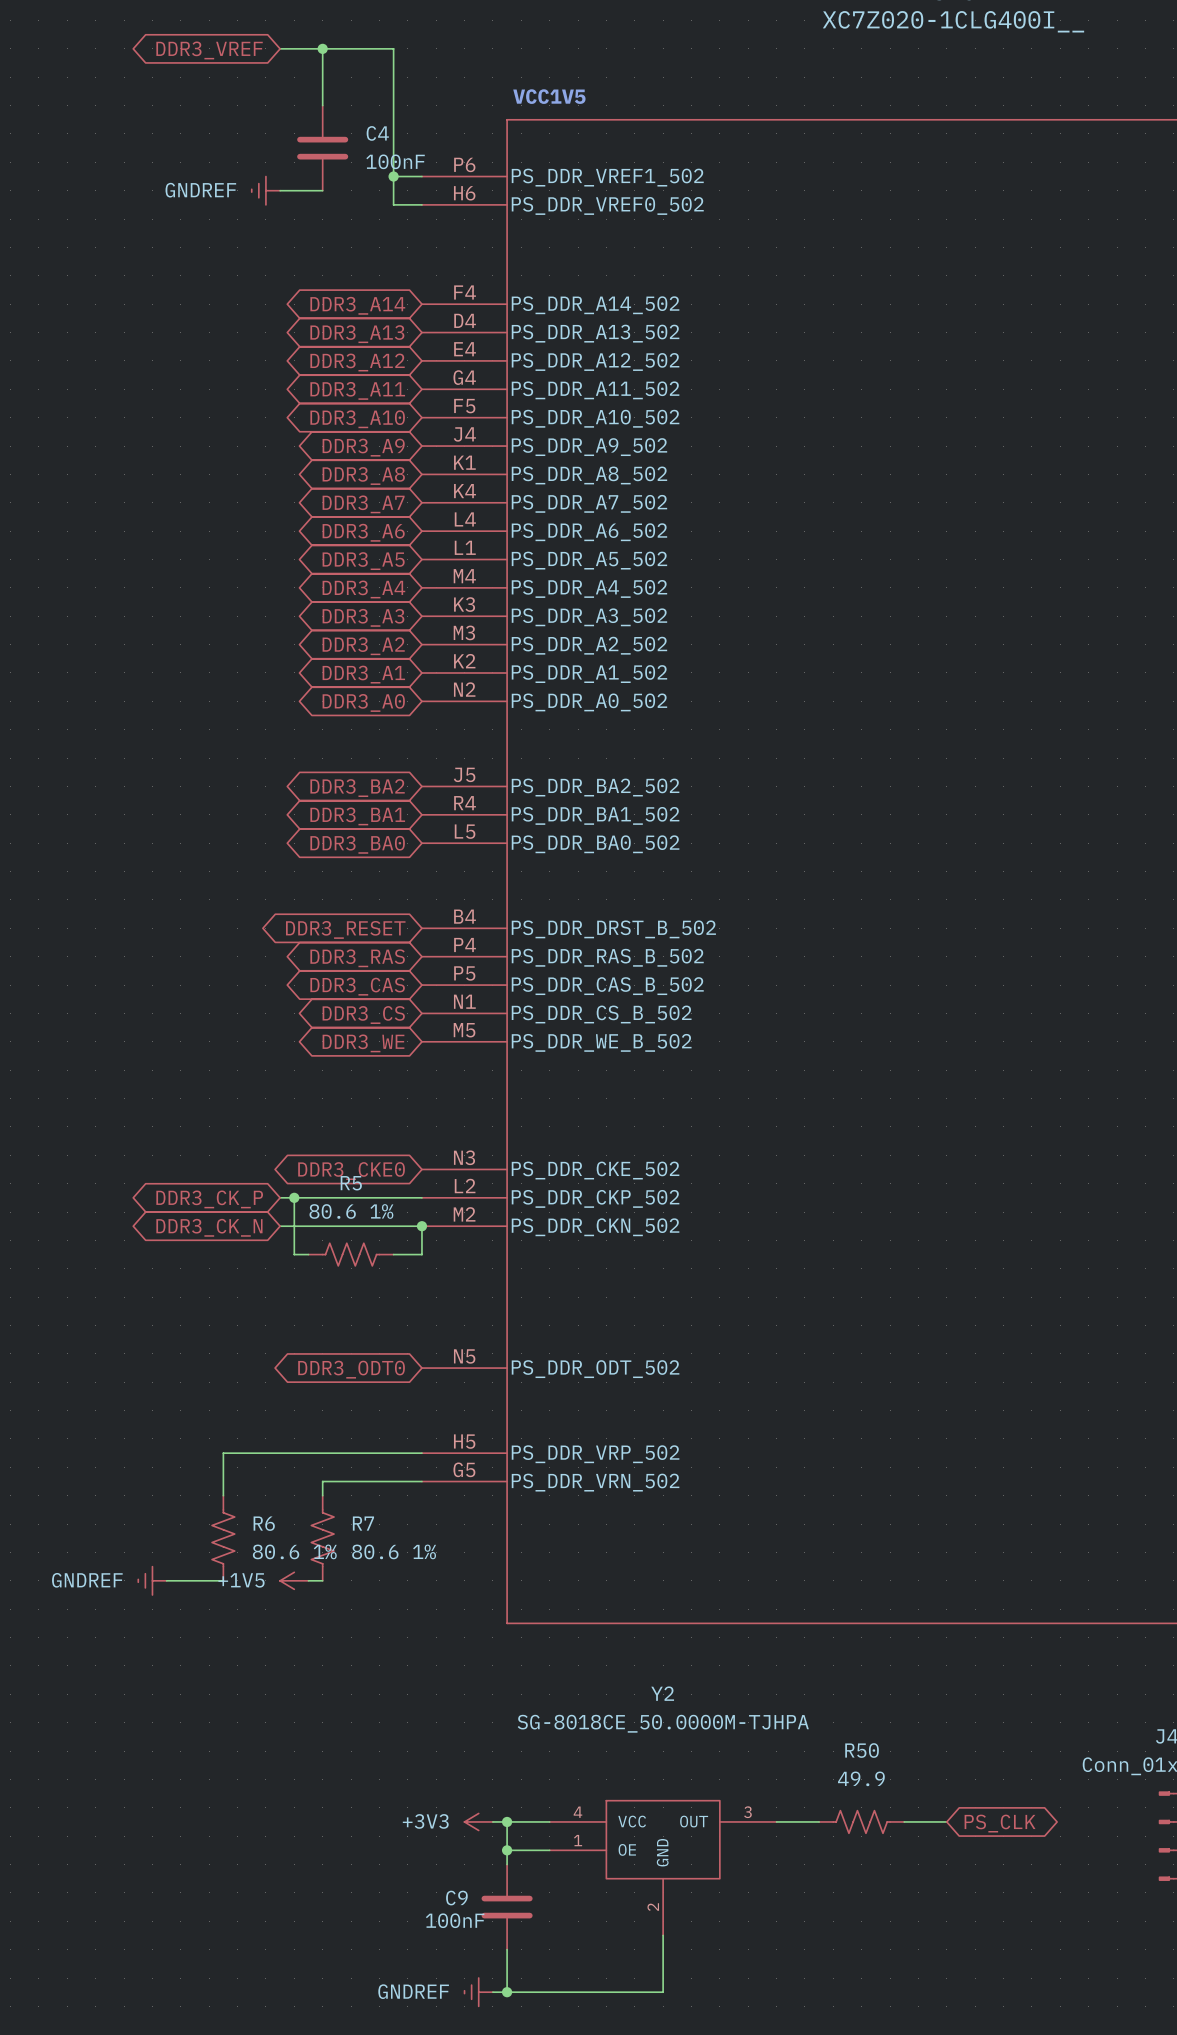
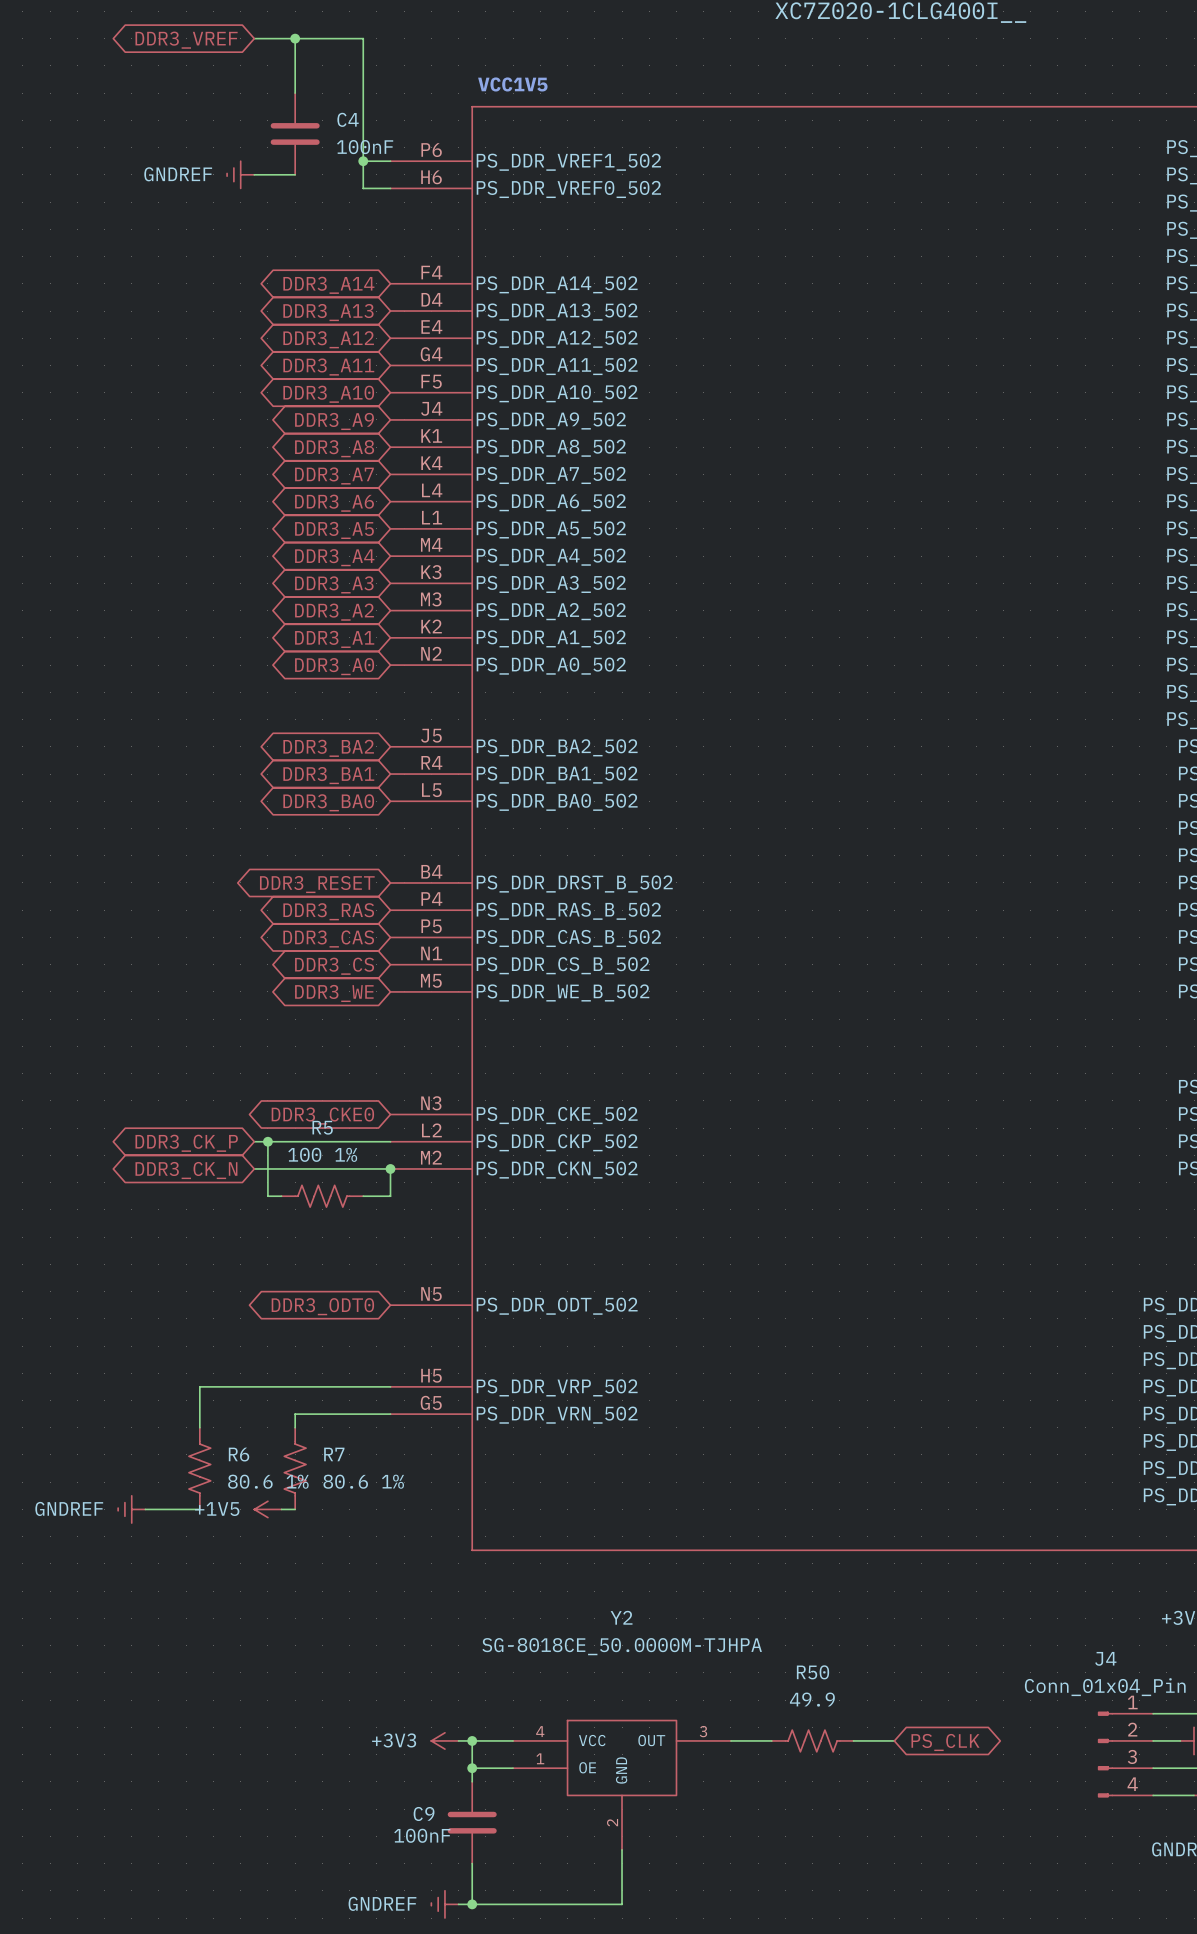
R5 value: 80.6 1% (351, 1211) -> 100 1% (322, 1154)

